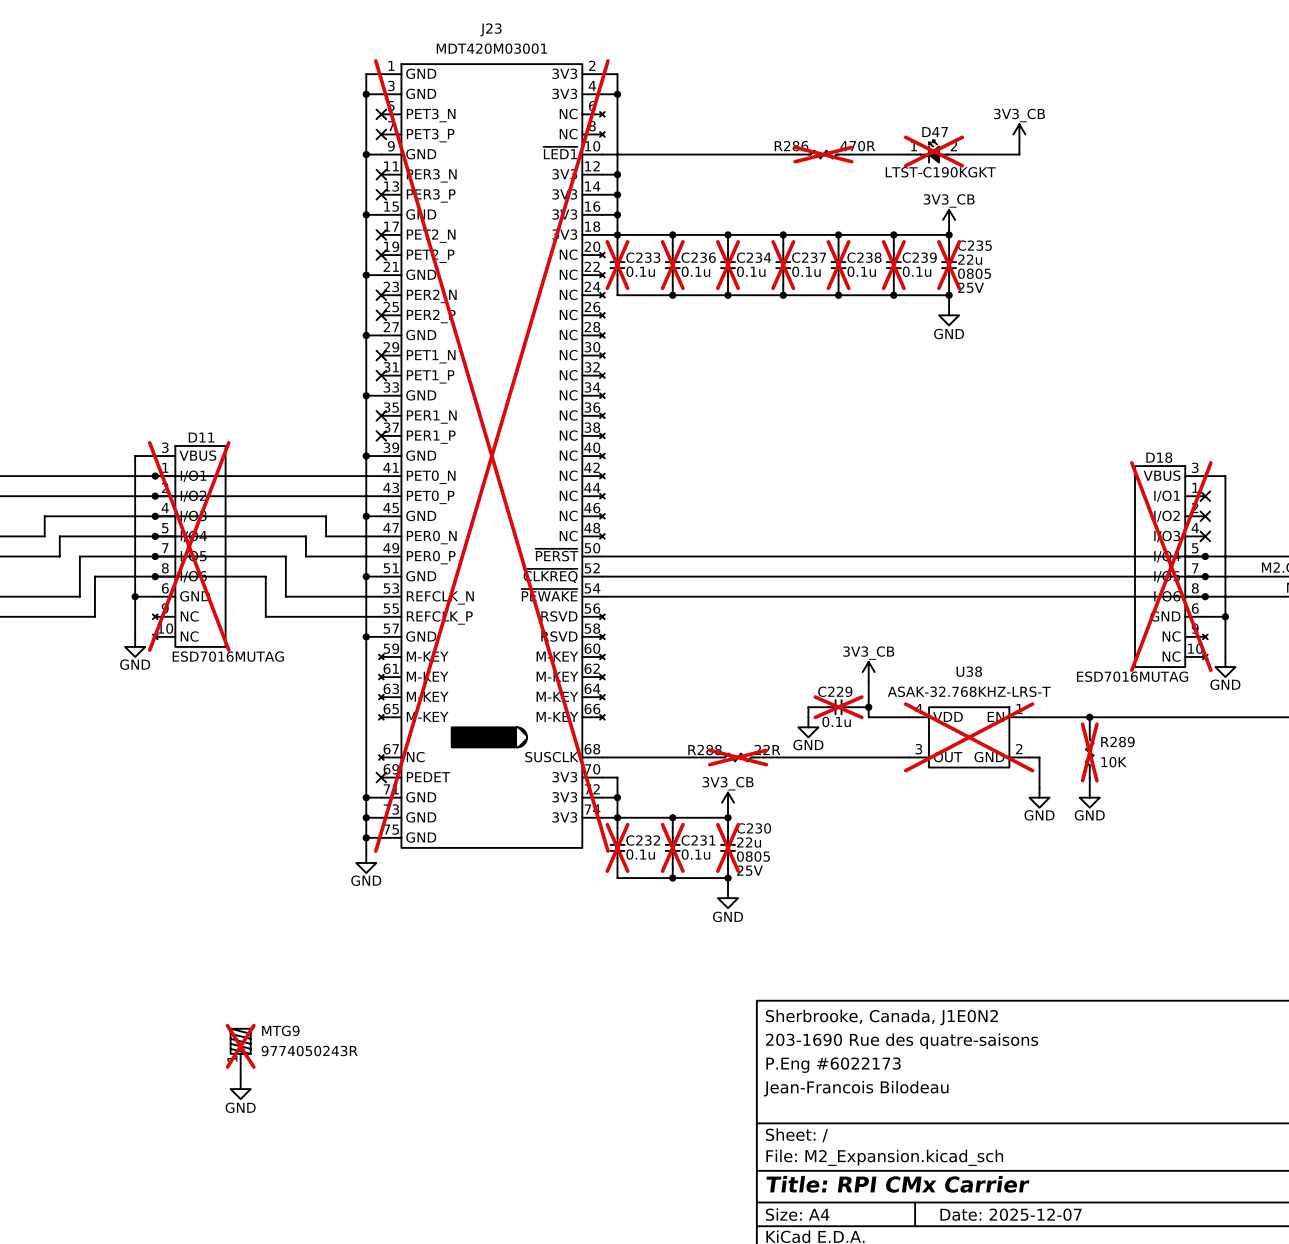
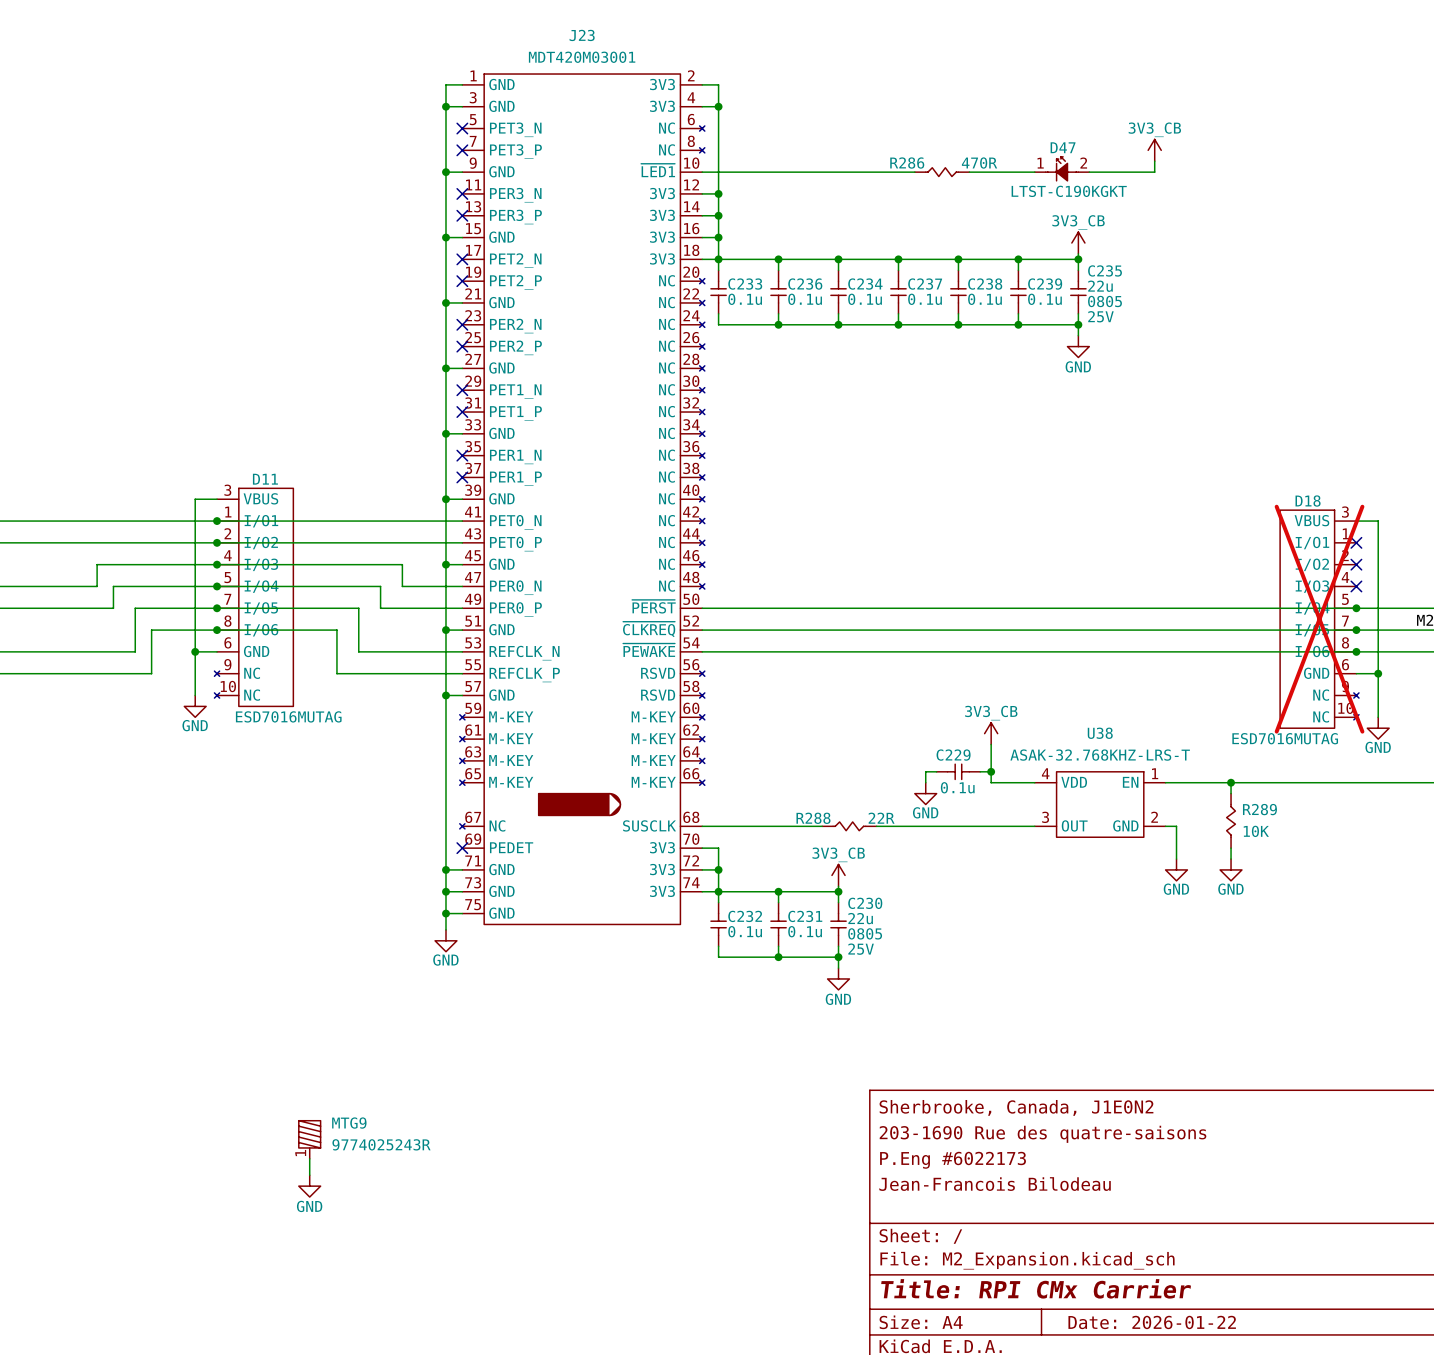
D47 do-not-place cross: (934, 151) -> none
R286 do-not-place cross: (823, 154) -> none
C233 do-not-place cross: (617, 265) -> none
C236 do-not-place cross: (672, 265) -> none
C234 do-not-place cross: (728, 265) -> none
C237 do-not-place cross: (783, 265) -> none
C238 do-not-place cross: (838, 265) -> none
C239 do-not-place cross: (893, 265) -> none
C235 do-not-place cross: (949, 265) -> none
J23 do-not-place cross: (491, 456) -> none
D11 do-not-place cross: (189, 546) -> none
C229 do-not-place cross: (838, 707) -> none
U38 do-not-place cross: (969, 737) -> none
R289 do-not-place cross: (1089, 752) -> none
R288 do-not-place cross: (738, 757) -> none
C232 do-not-place cross: (617, 847) -> none
C231 do-not-place cross: (672, 847) -> none
C230 do-not-place cross: (728, 847) -> none
MTG9 do-not-place cross: (240, 1046) -> none
MTG9 value: 9774050243R (309, 1051) -> 9774025243R (381, 1144)
title block: Date: 2025-12-07 (1011, 1214) -> Date: 2026-01-22 (1152, 1322)

